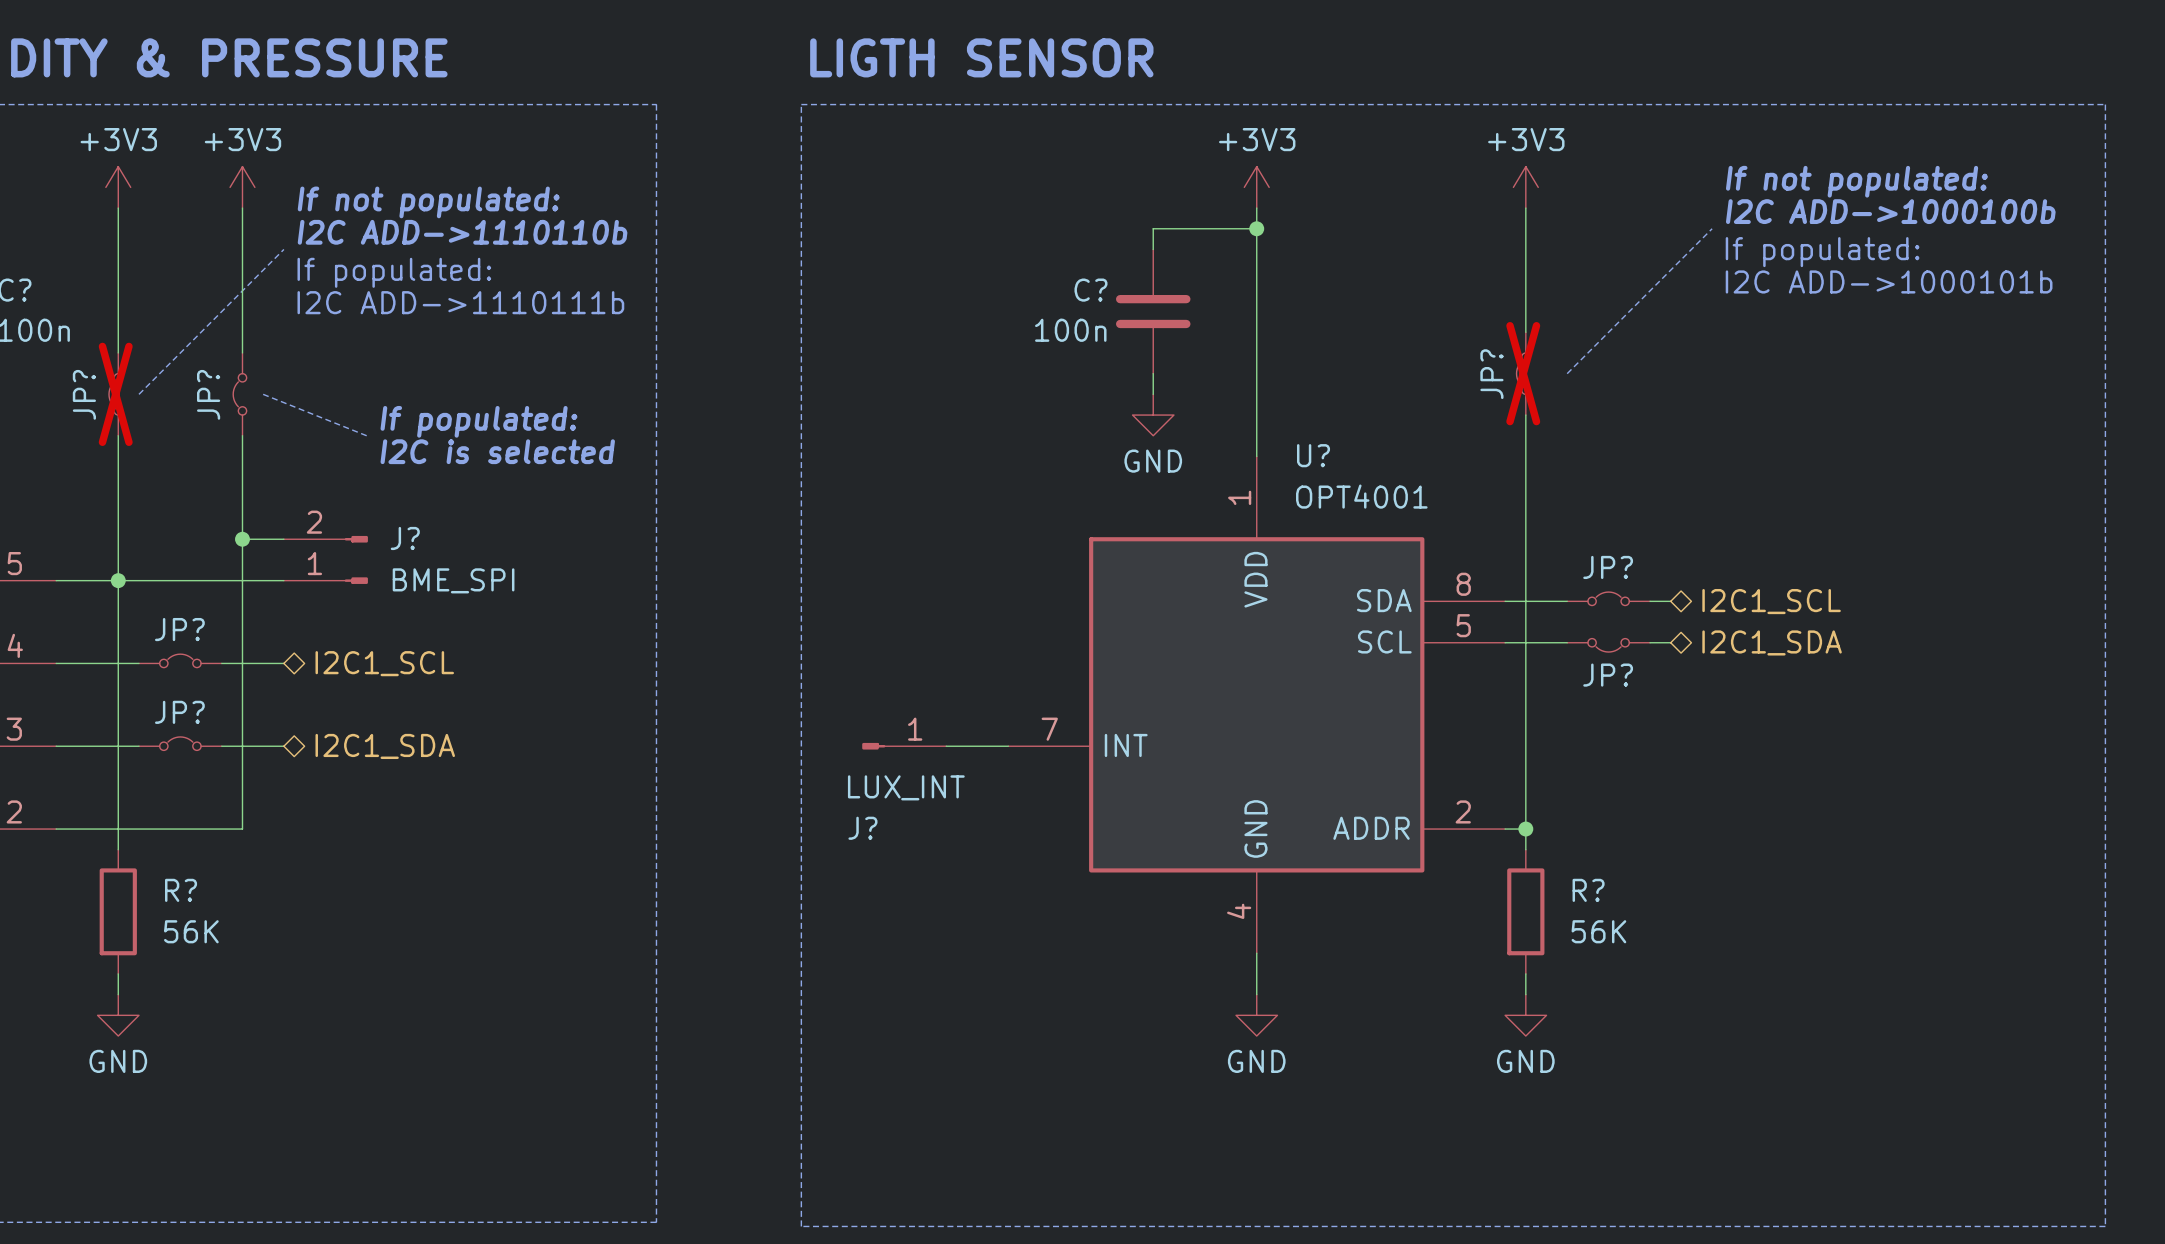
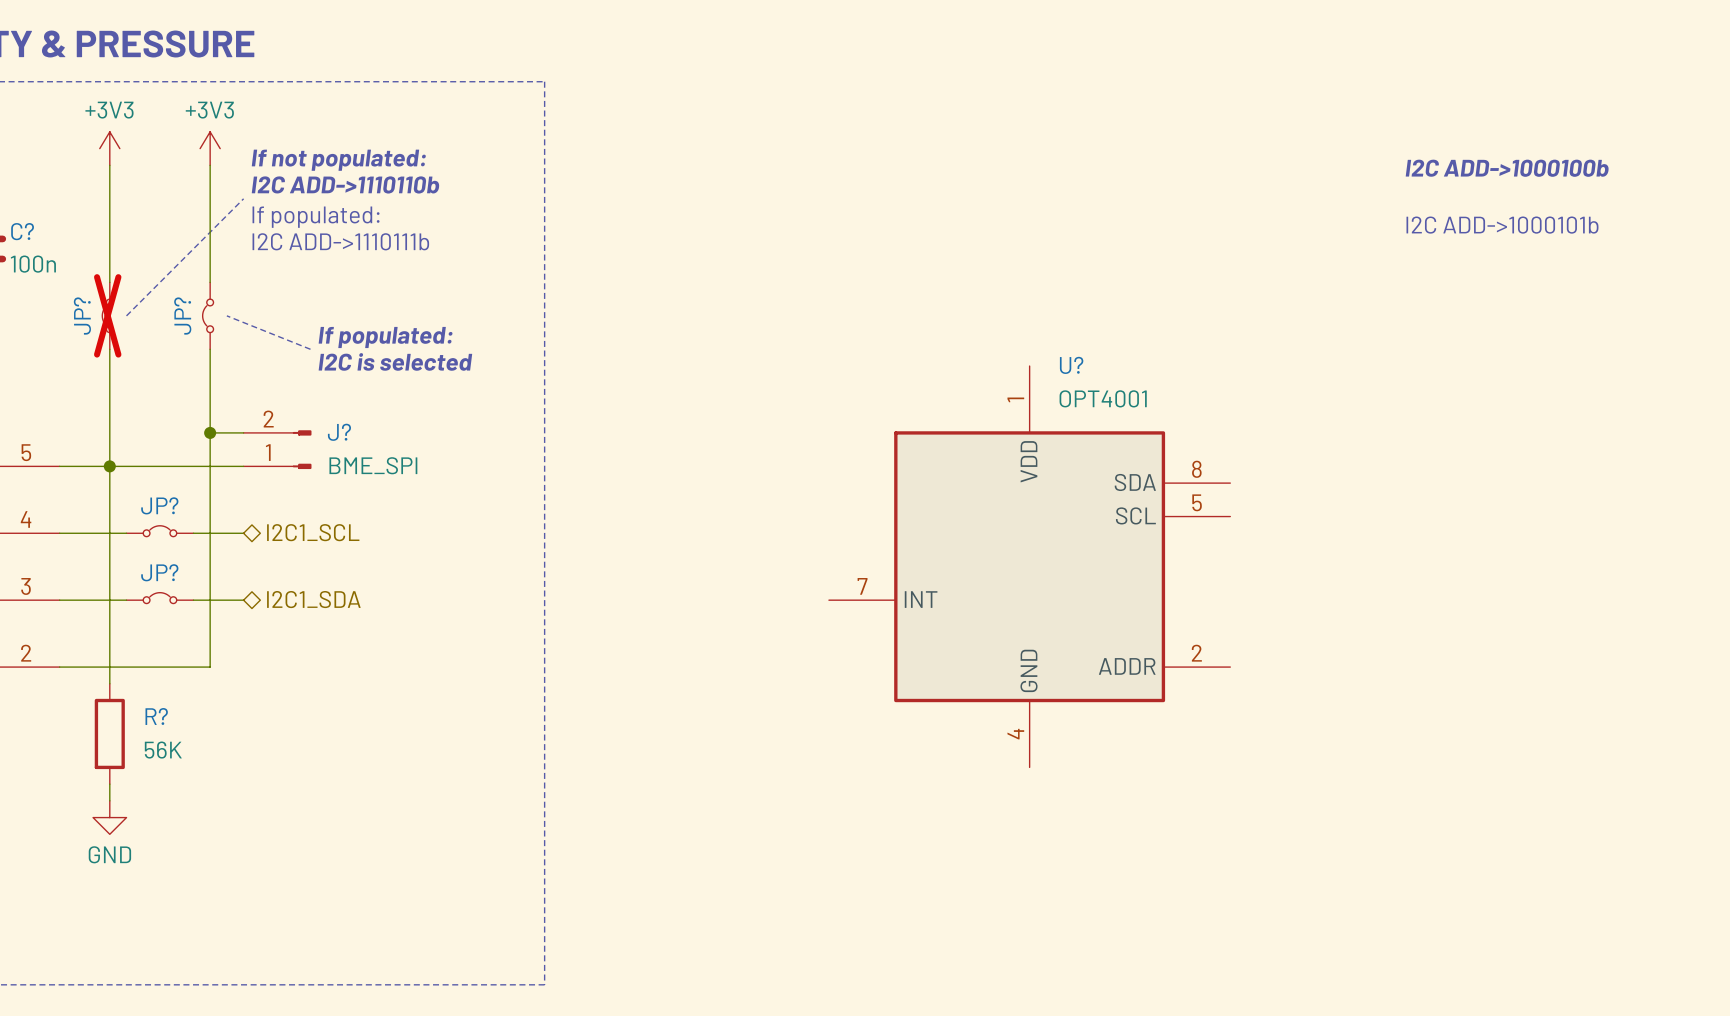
text: LIGTH SENSOR (981, 57) -> none
line: (801, 104) (2105, 104) (2105, 1226) (801, 1226) (801, 104) -> none
text: If not populated: (1856, 181) -> none
power symbol: +3V3 (1256, 187) -> none
power symbol: +3V3 (1525, 187) -> none
wire: (1256, 208) (1256, 456) -> none
wire: (1525, 208) (1525, 332) -> none
wire: (1256, 228) (1153, 228) (1153, 249) -> none
junction: (1256, 228) -> none
line: (1712, 228) (1567, 373) -> none
text: If populated: (1822, 252) -> none
C?: 100n (1153, 311) -> none
wire: (1153, 373) (1153, 394) -> none
JP?: (1523, 373) -> none
power symbol: GND (1153, 415) -> none
wire: (1525, 415) (1525, 849) -> none
JP?: (1608, 598) -> none
wire: (1505, 601) (1567, 601) -> none
wire: (1650, 601) (1670, 601) -> none
hierarchical label: I2C1_SCL (1771, 601) -> none
wire: (1505, 642) (1567, 642) -> none
wire: (1650, 642) (1670, 642) -> none
hierarchical label: I2C1_SDA (1772, 642) -> none
JP?: (1608, 645) -> none
J?: LUX_INT (904, 746) -> none
wire: (946, 746) (1008, 746) -> none
wire: (1505, 829) (1525, 829) -> none
junction: (1525, 829) -> none
R?: 56K (1525, 911) -> none
wire: (1256, 953) (1256, 994) -> none
wire: (1525, 973) (1525, 994) -> none
power symbol: GND (1256, 1015) -> none
power symbol: GND (1525, 1015) -> none

